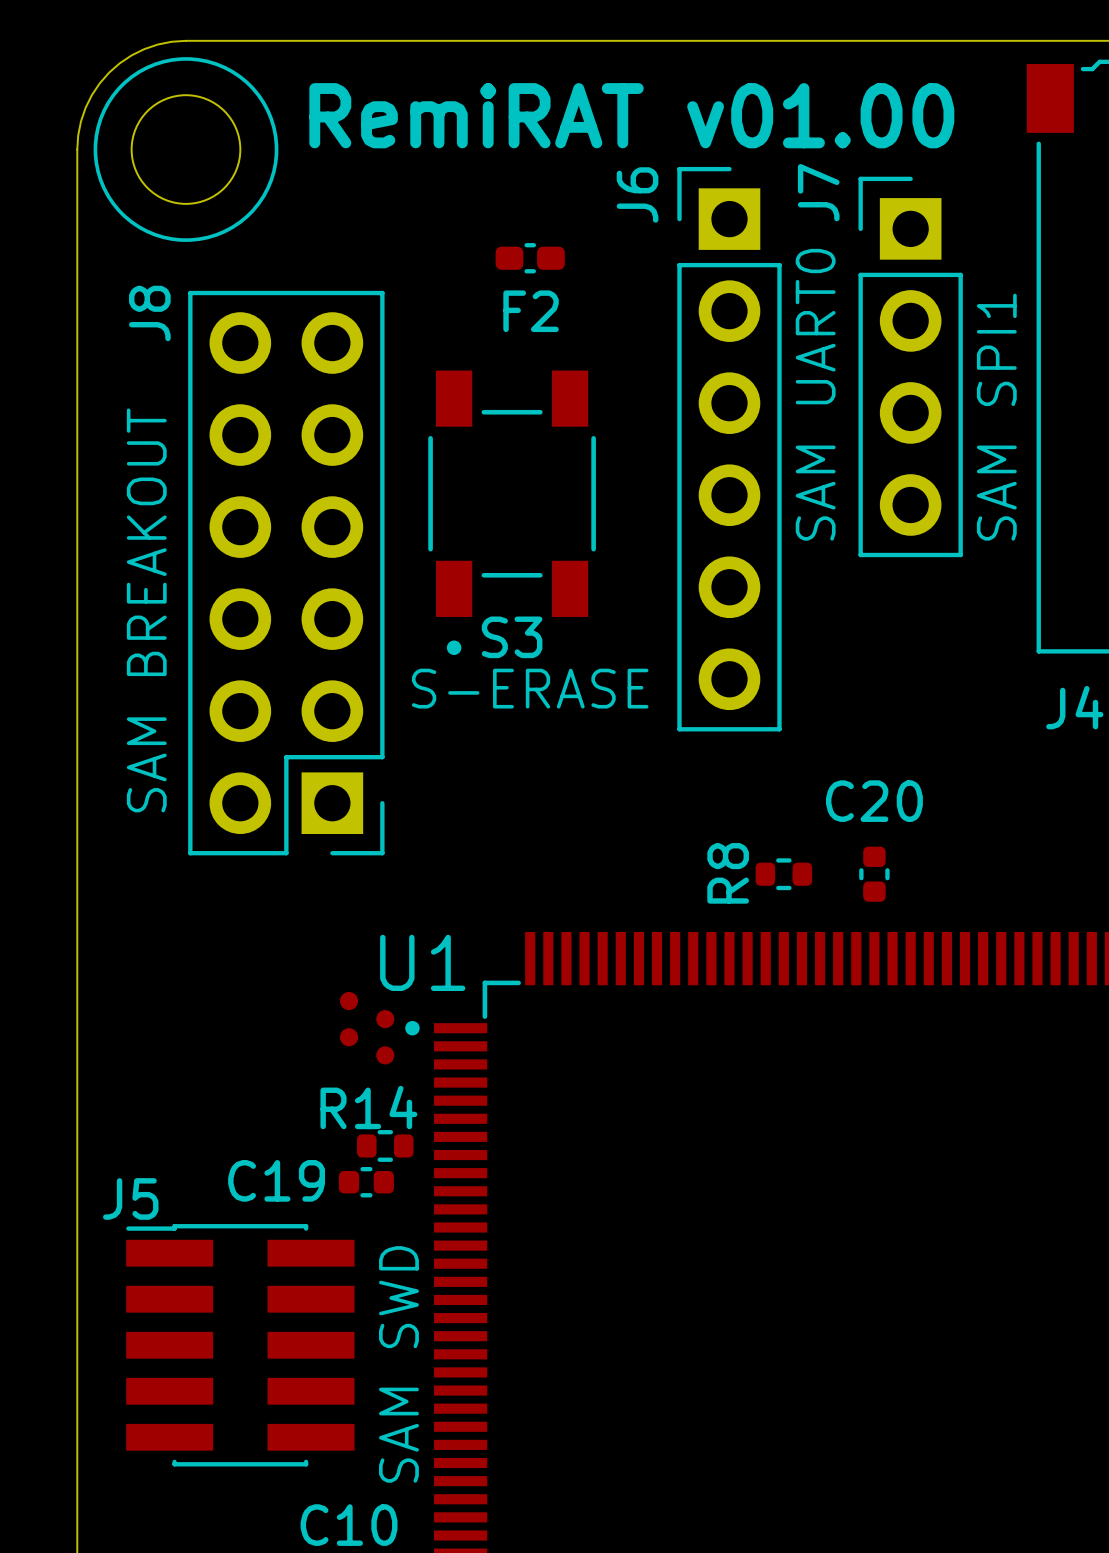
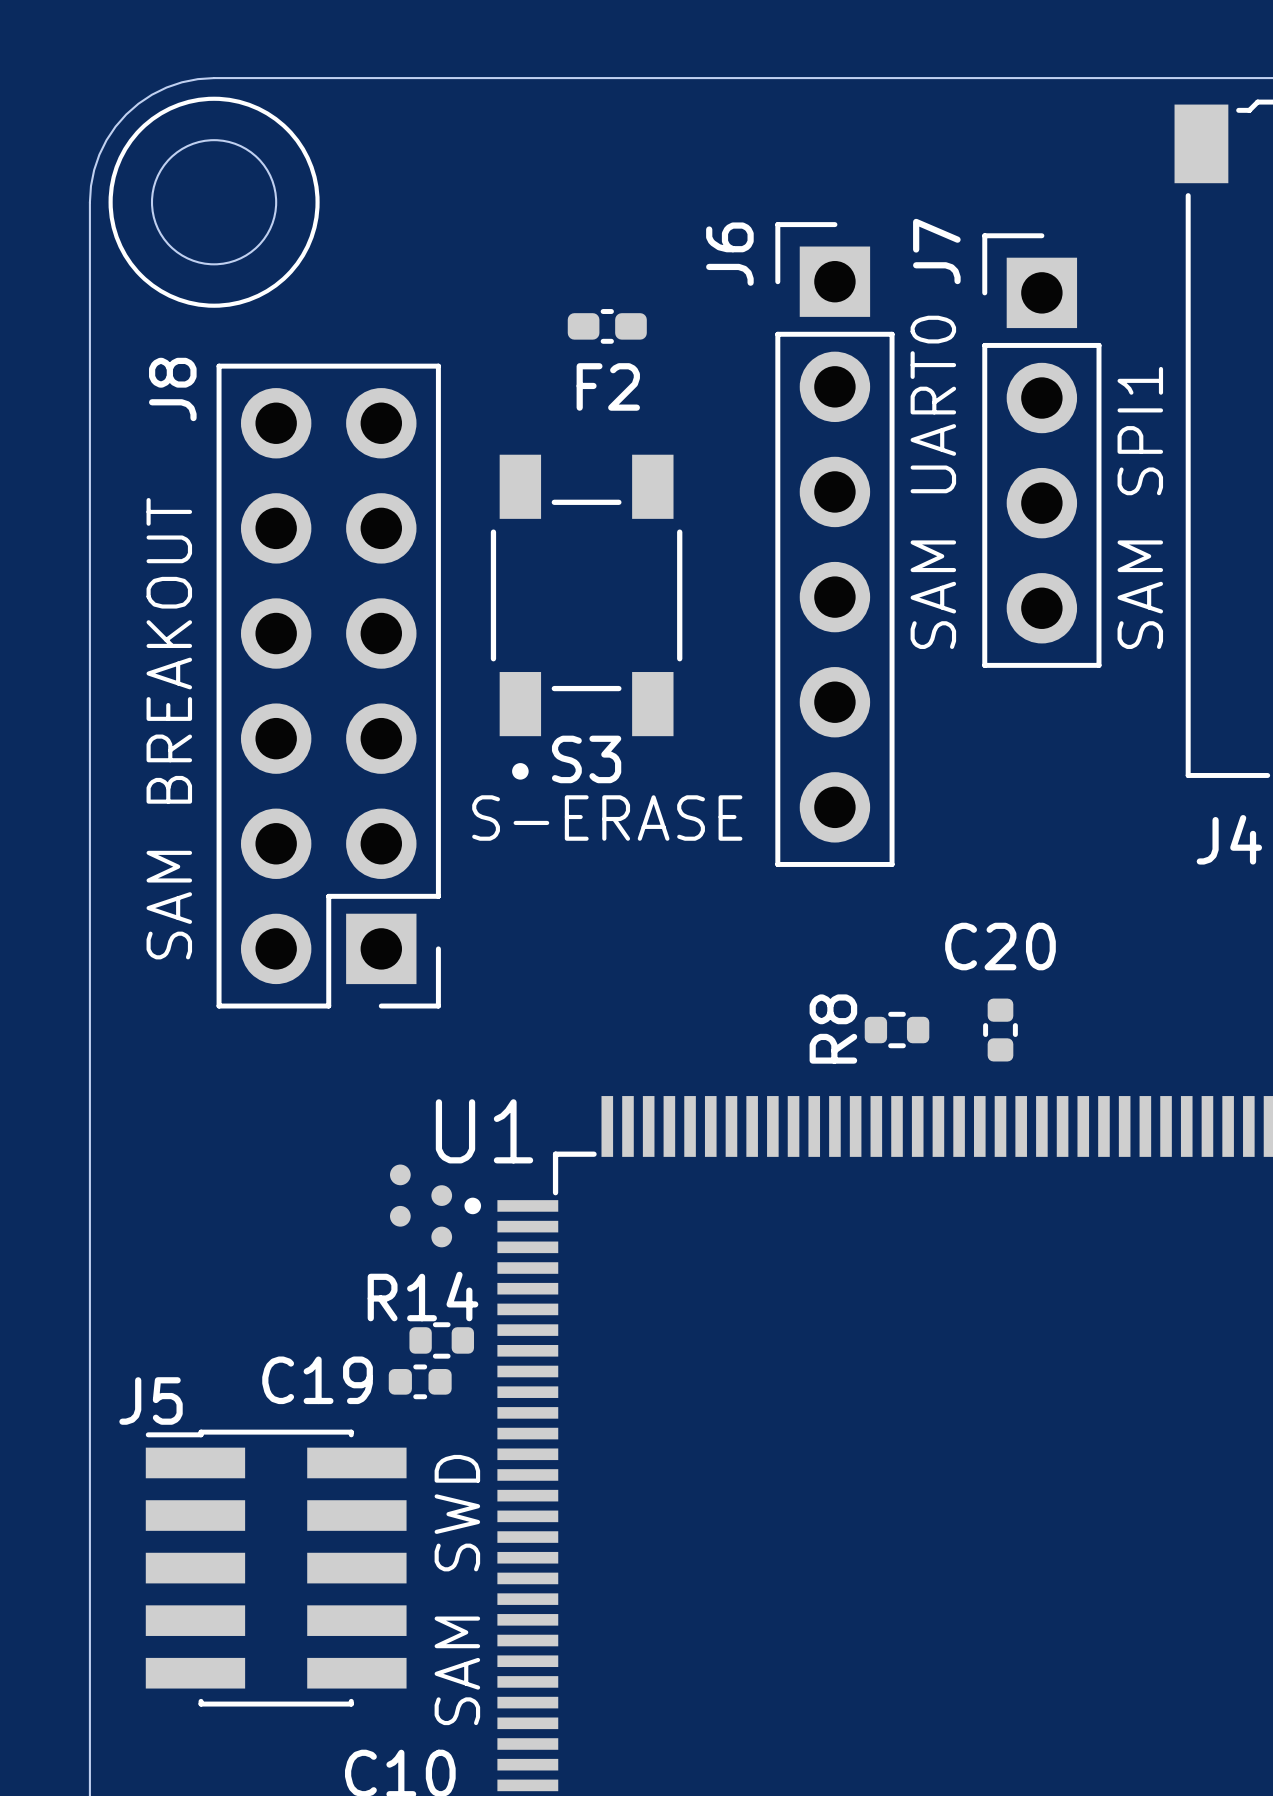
text: RemiRAT v01.00 (631, 115) -> none

